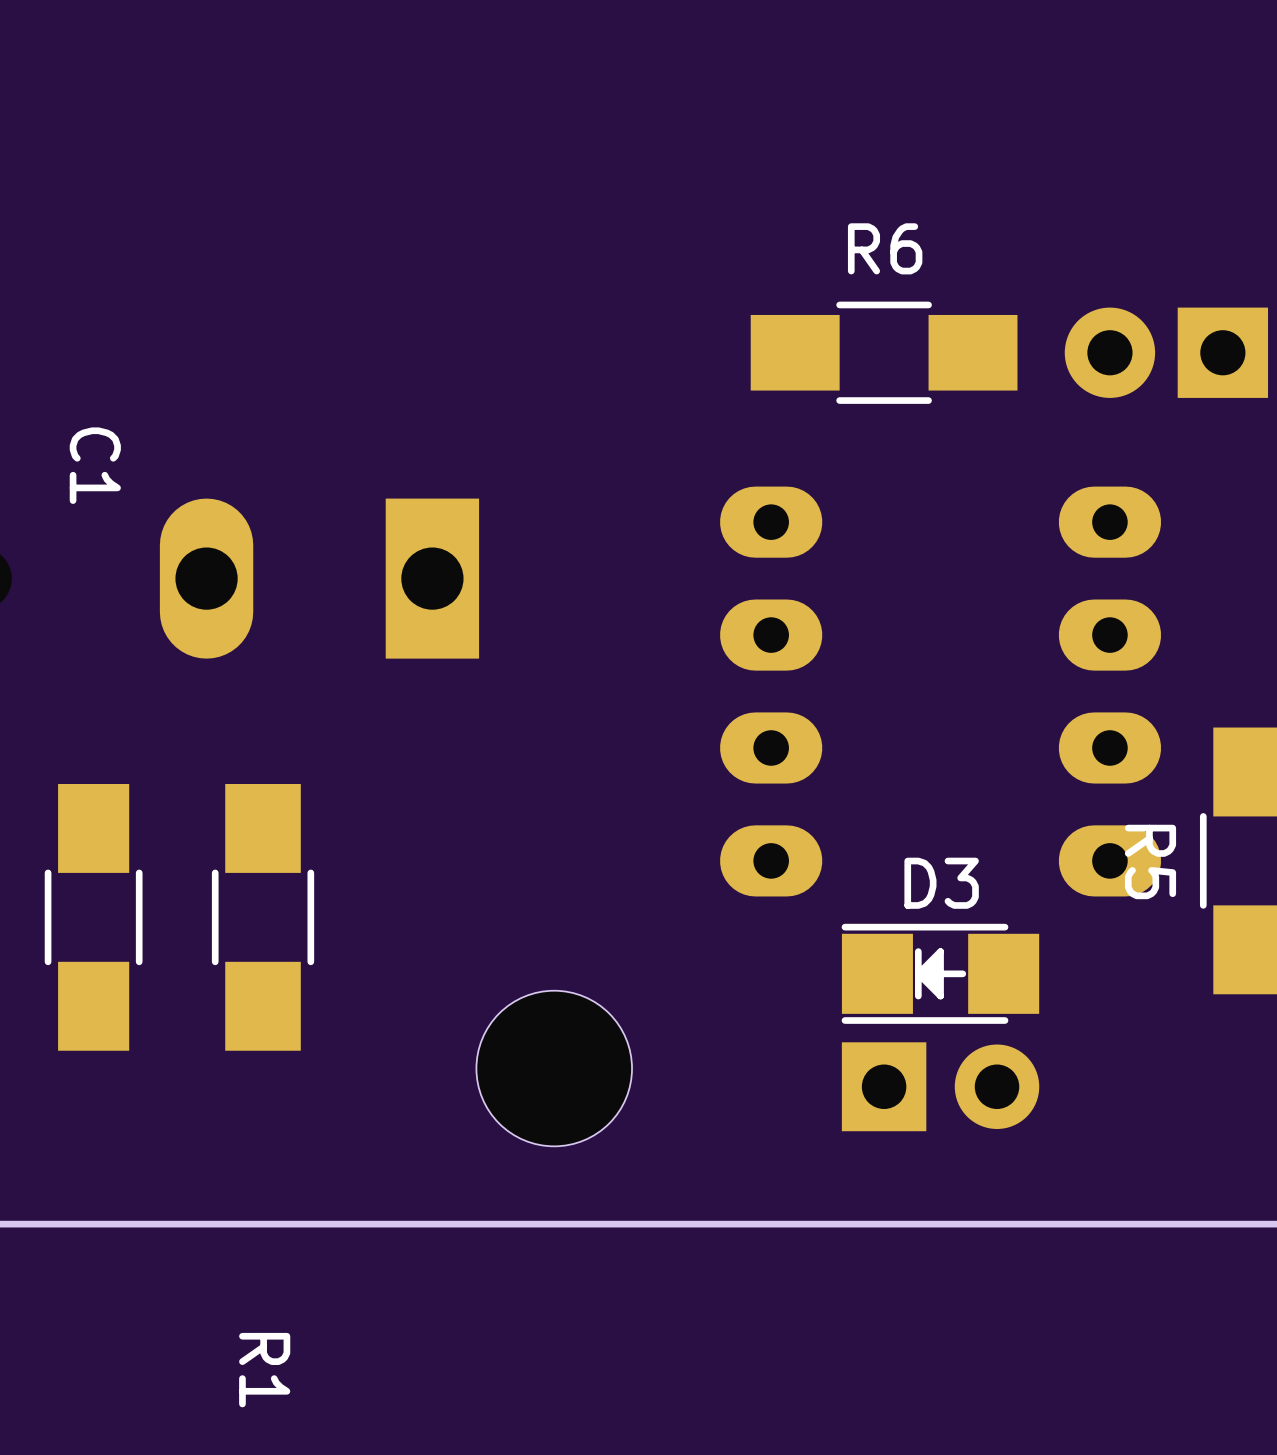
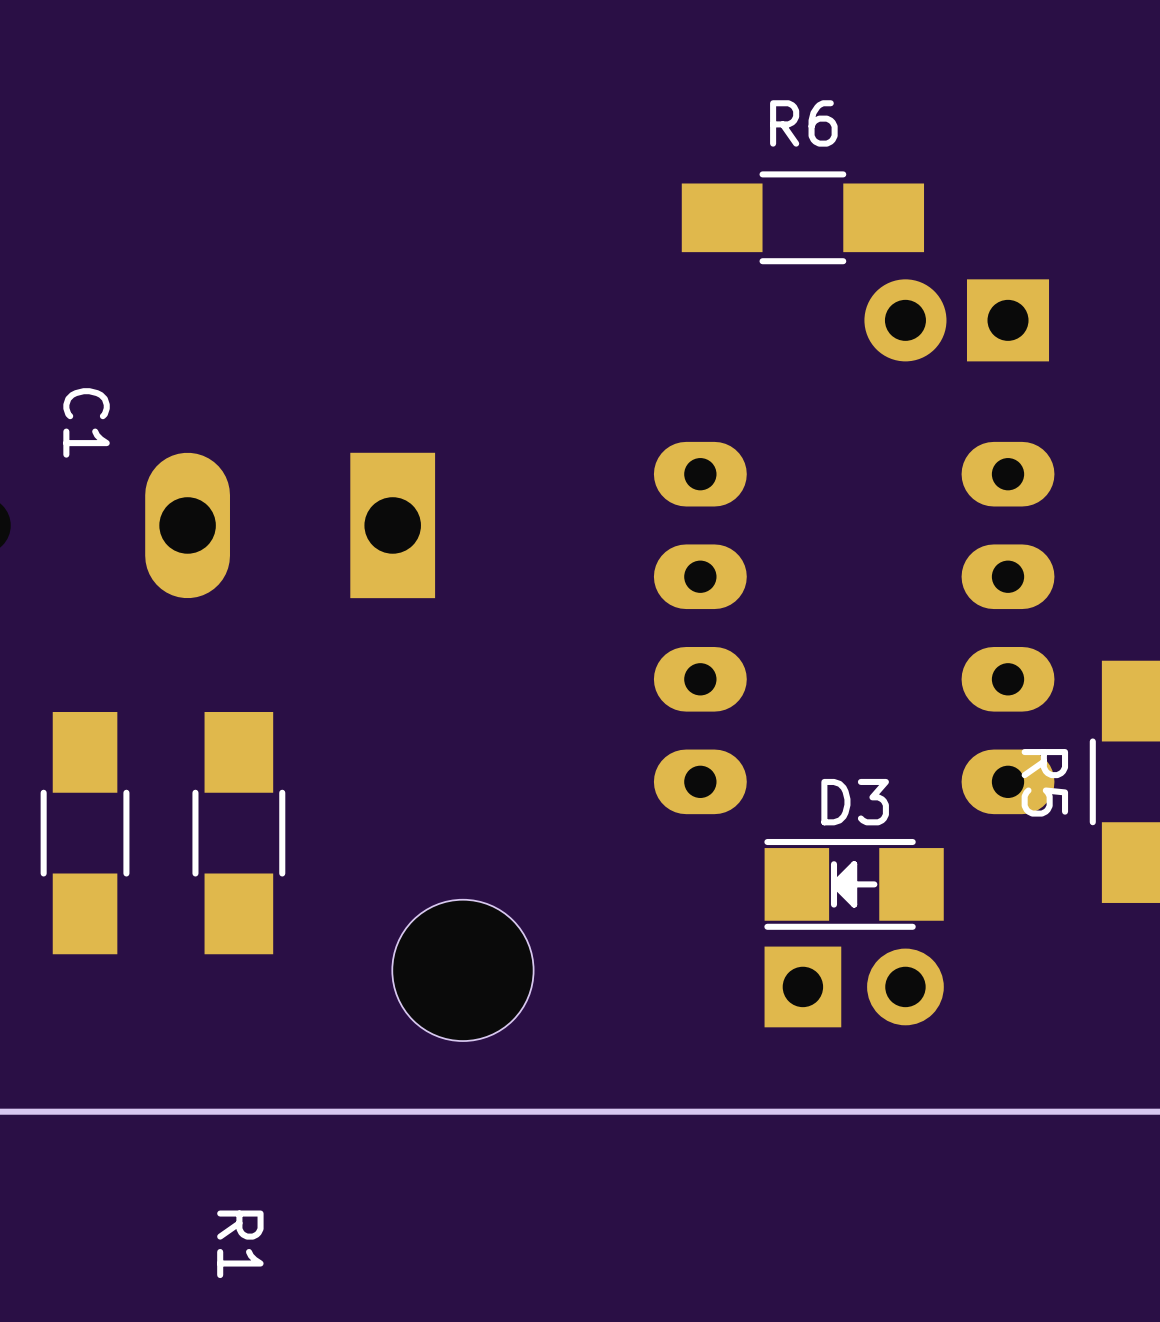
R6 position: (884, 352) -> (802, 217)
part position: (1166, 352) -> (956, 320)
part position: (554, 1068) -> (462, 970)

